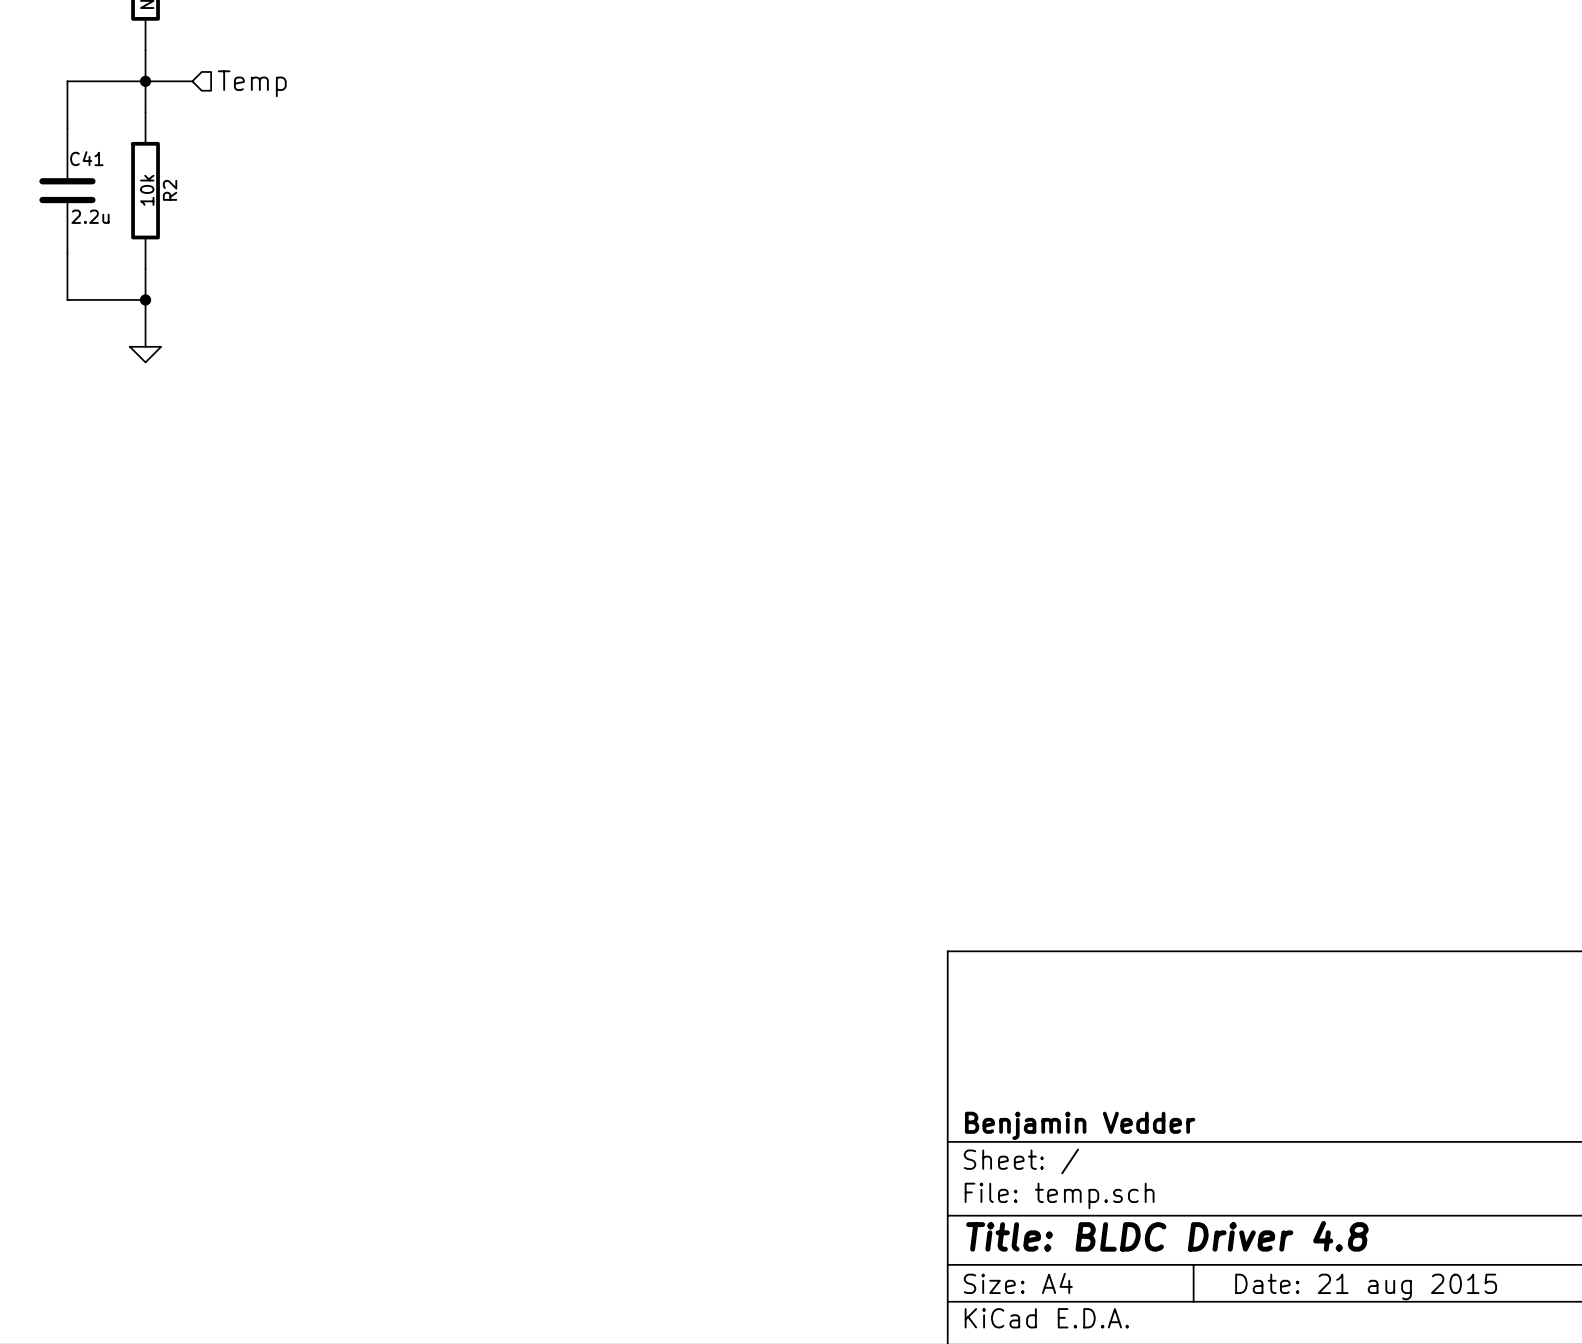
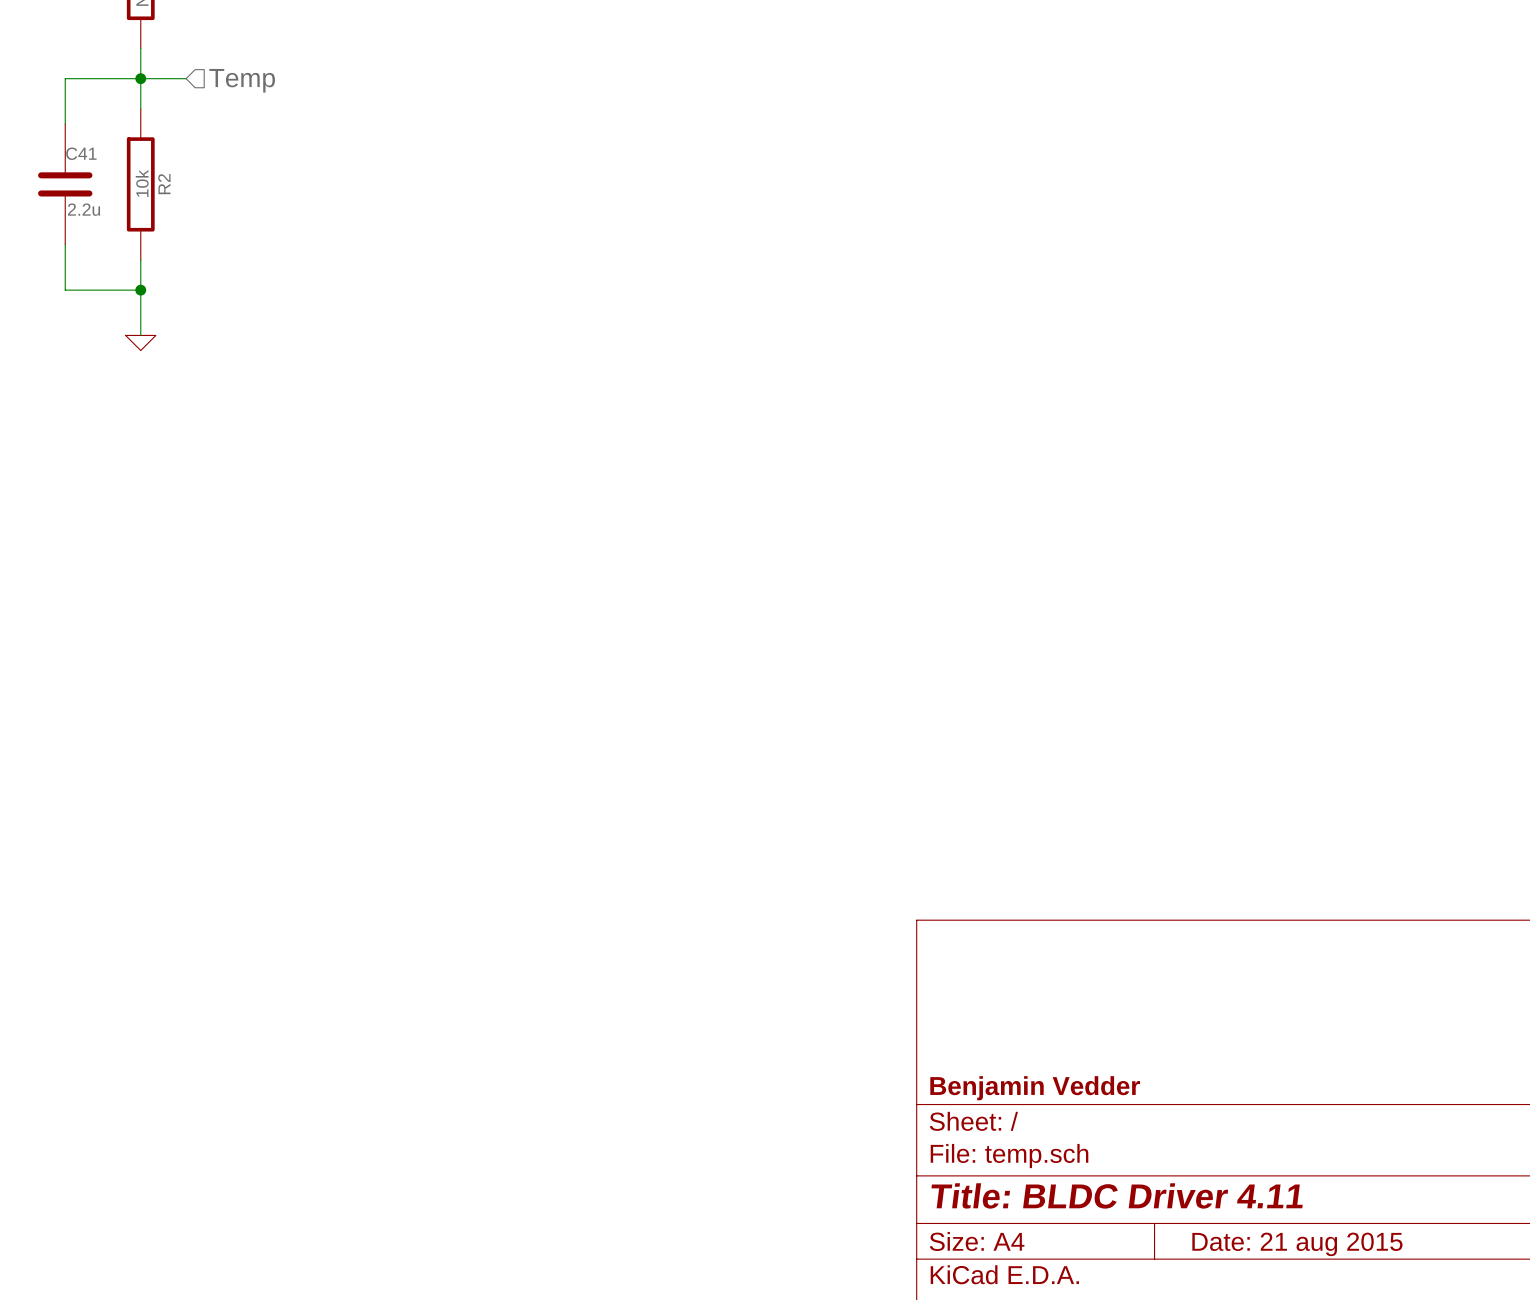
title block: Title: BLDC Driver 4.8 (1167, 1236) -> Title: BLDC Driver 4.11 (1117, 1195)

